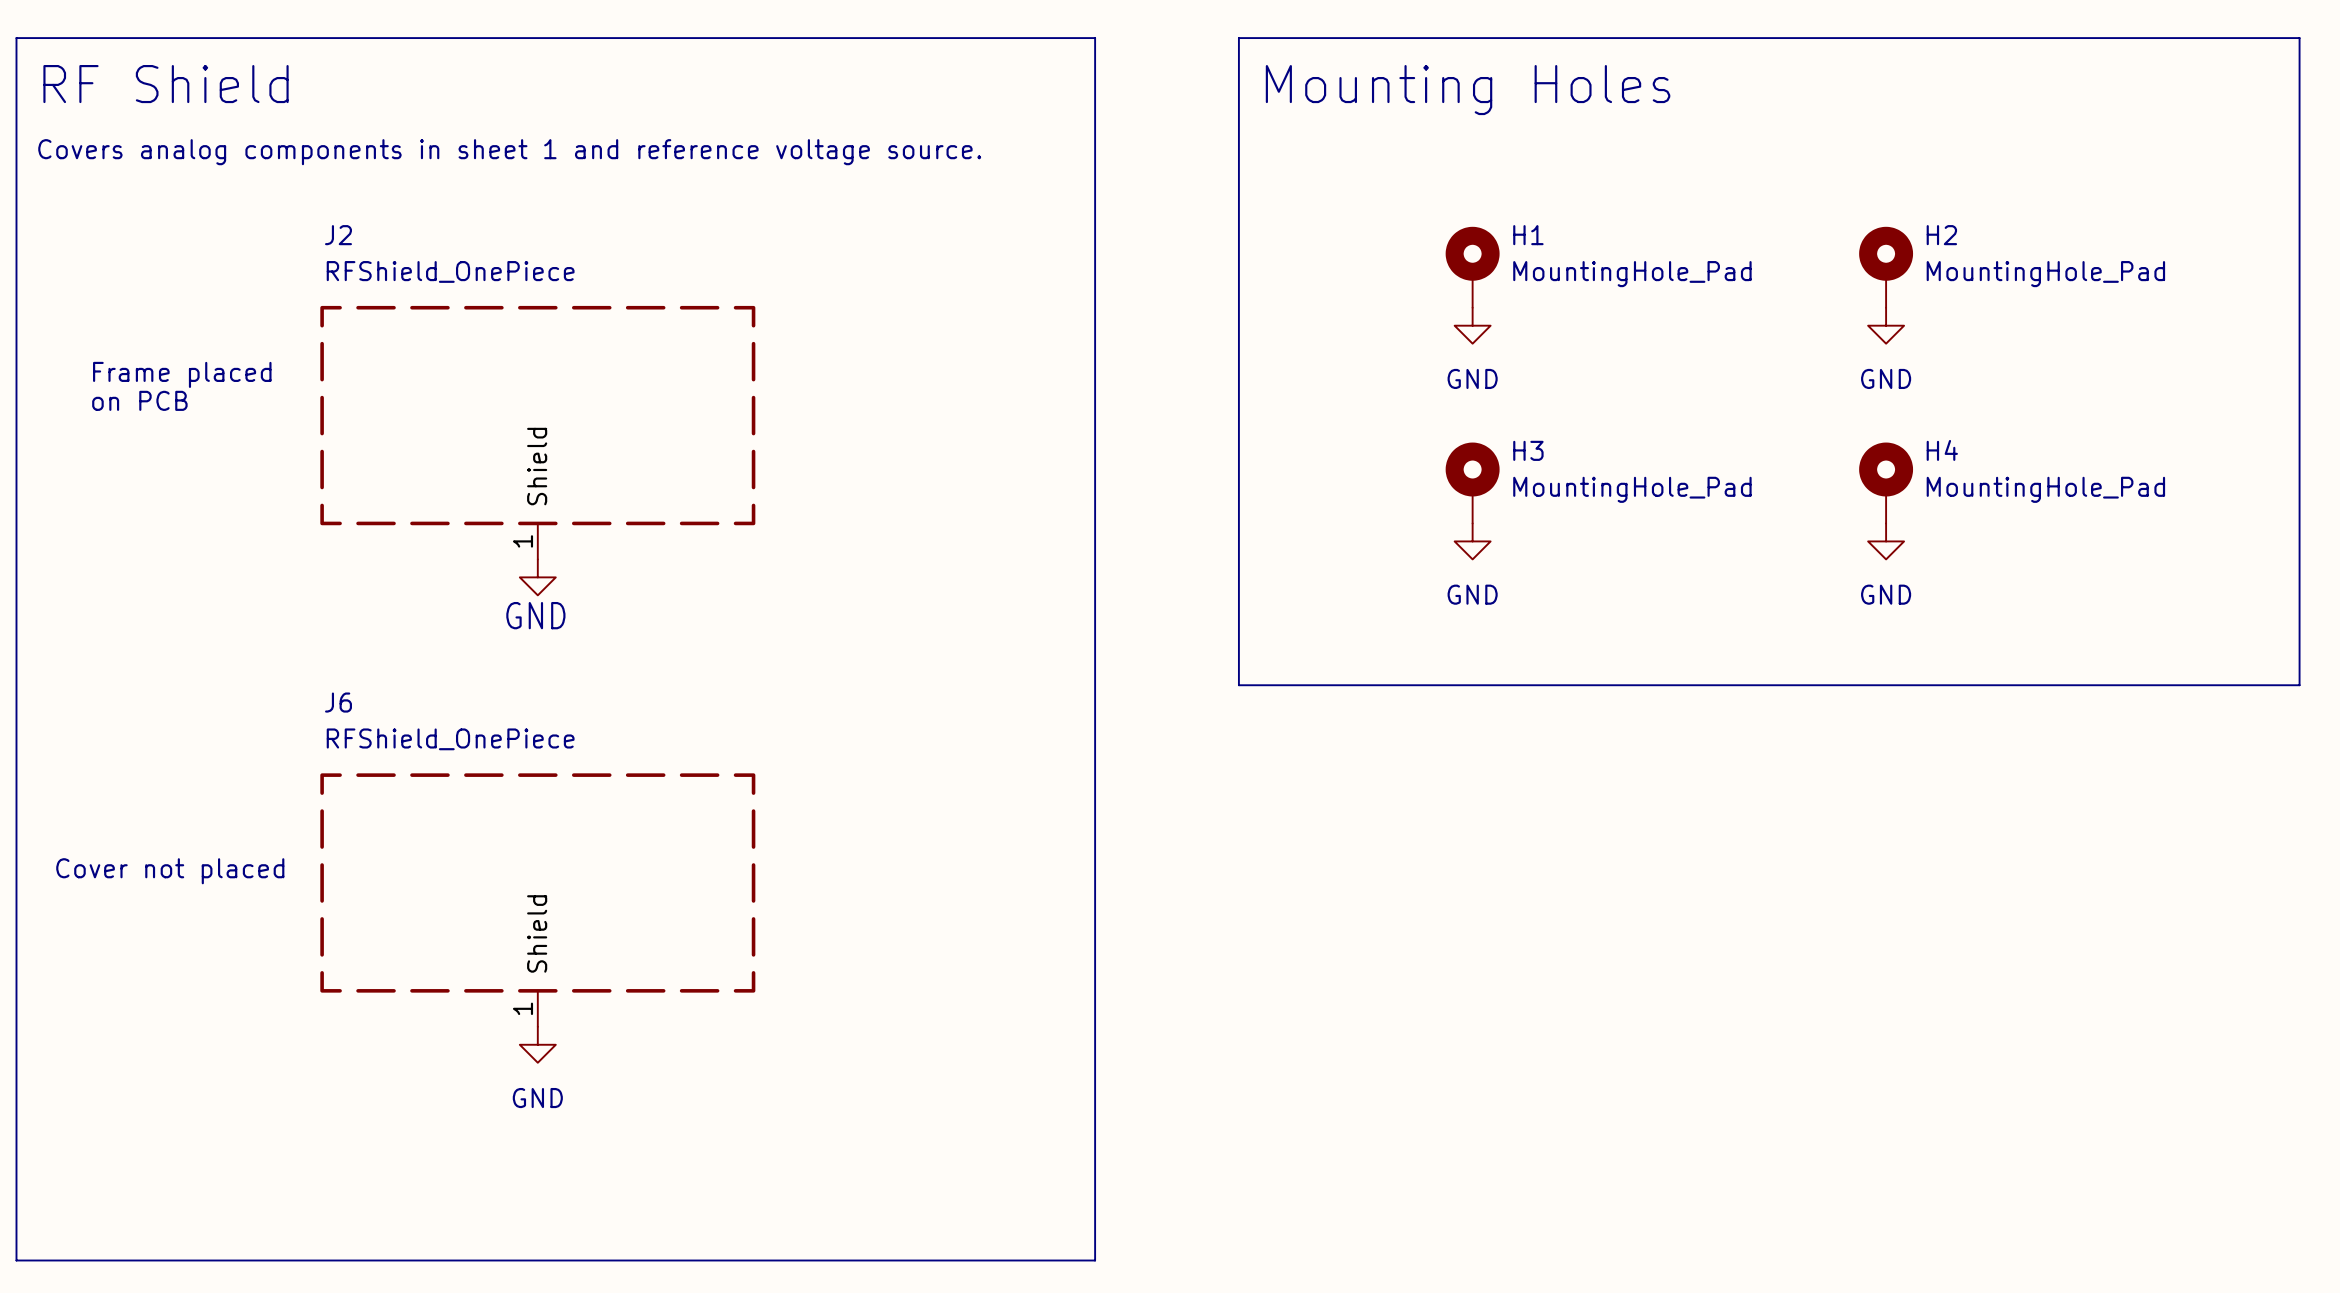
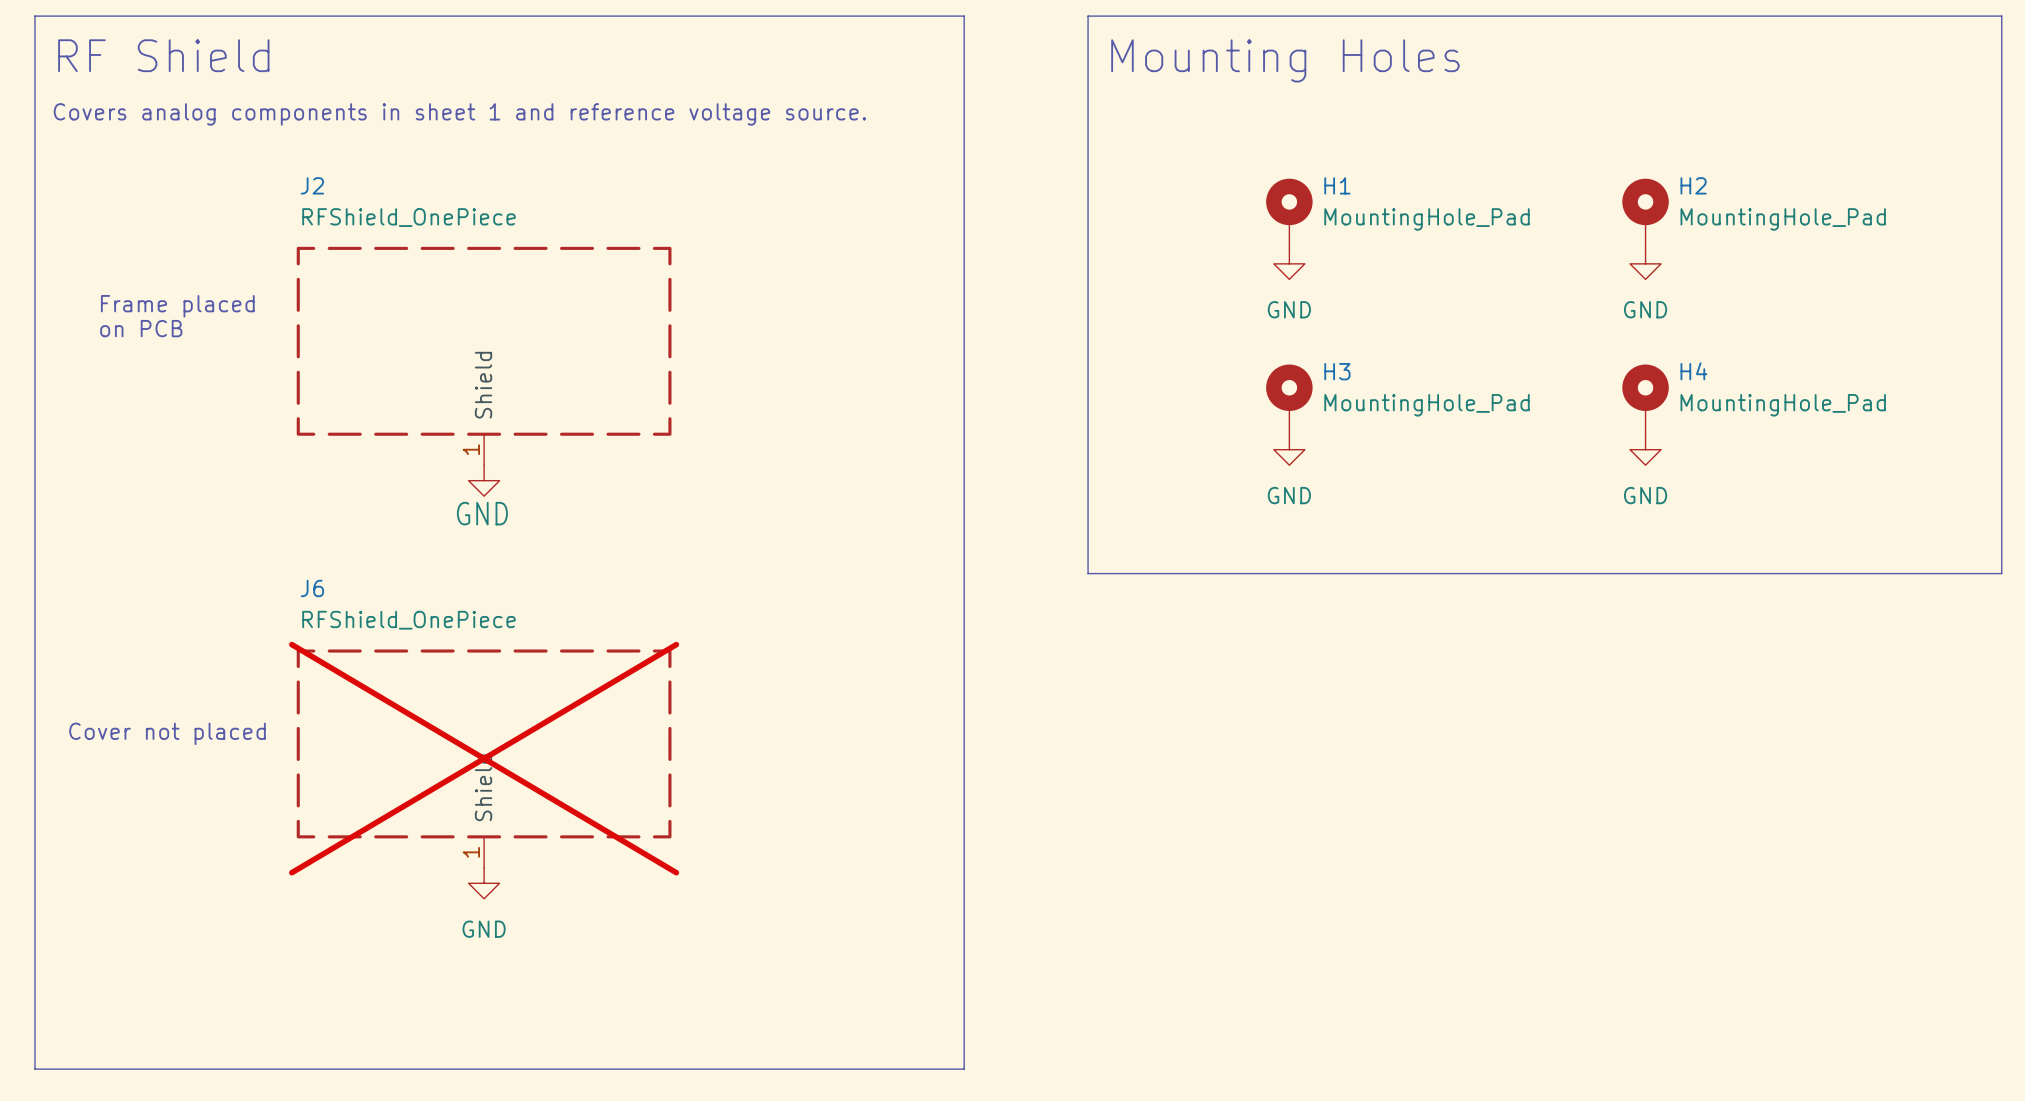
J6 do-not-place cross: none -> (484, 758)

